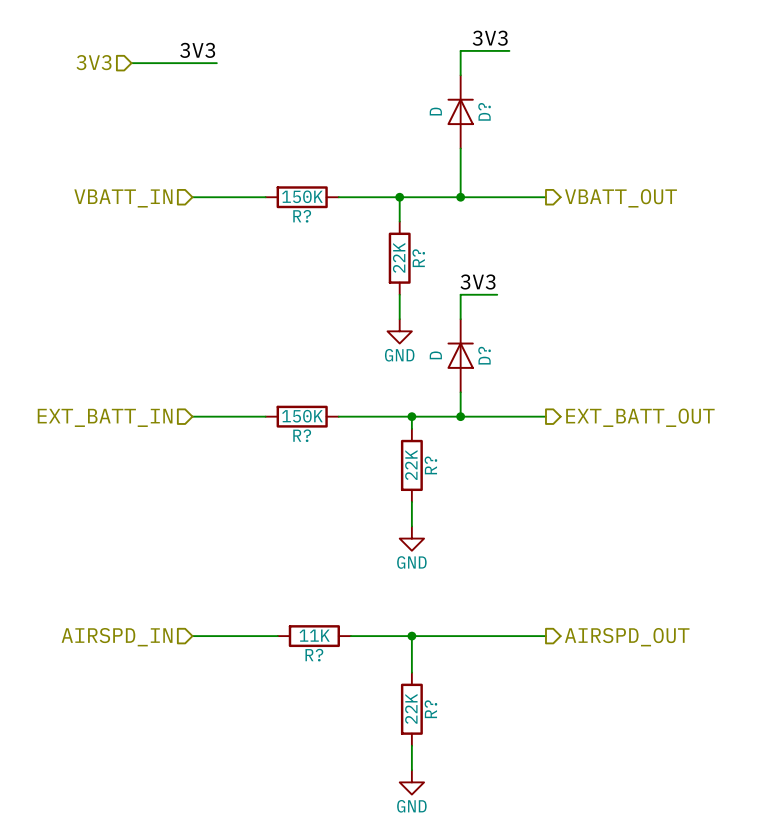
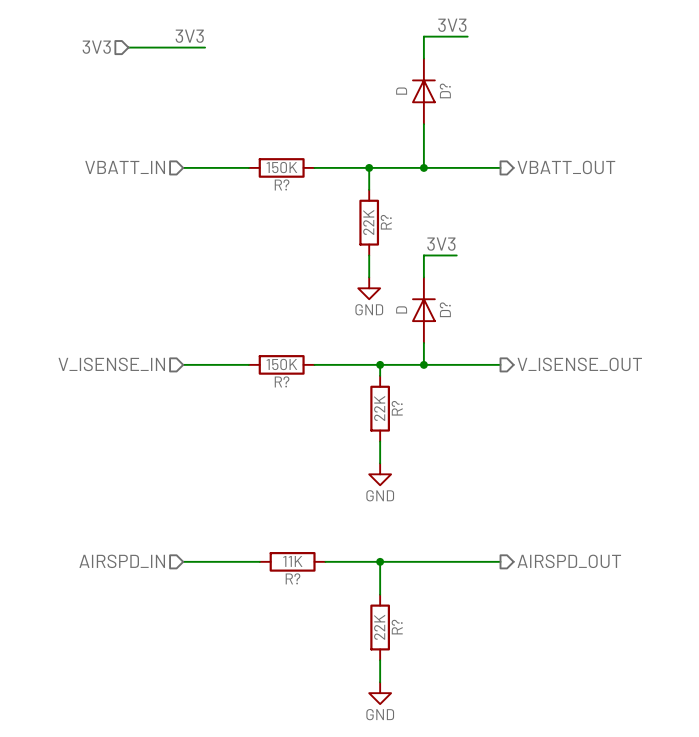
hierarchical label: EXT_BATT_IN (105, 417) -> V_ISENSE_IN (111, 364)
hierarchical label: EXT_BATT_OUT (640, 417) -> V_ISENSE_OUT (579, 364)

